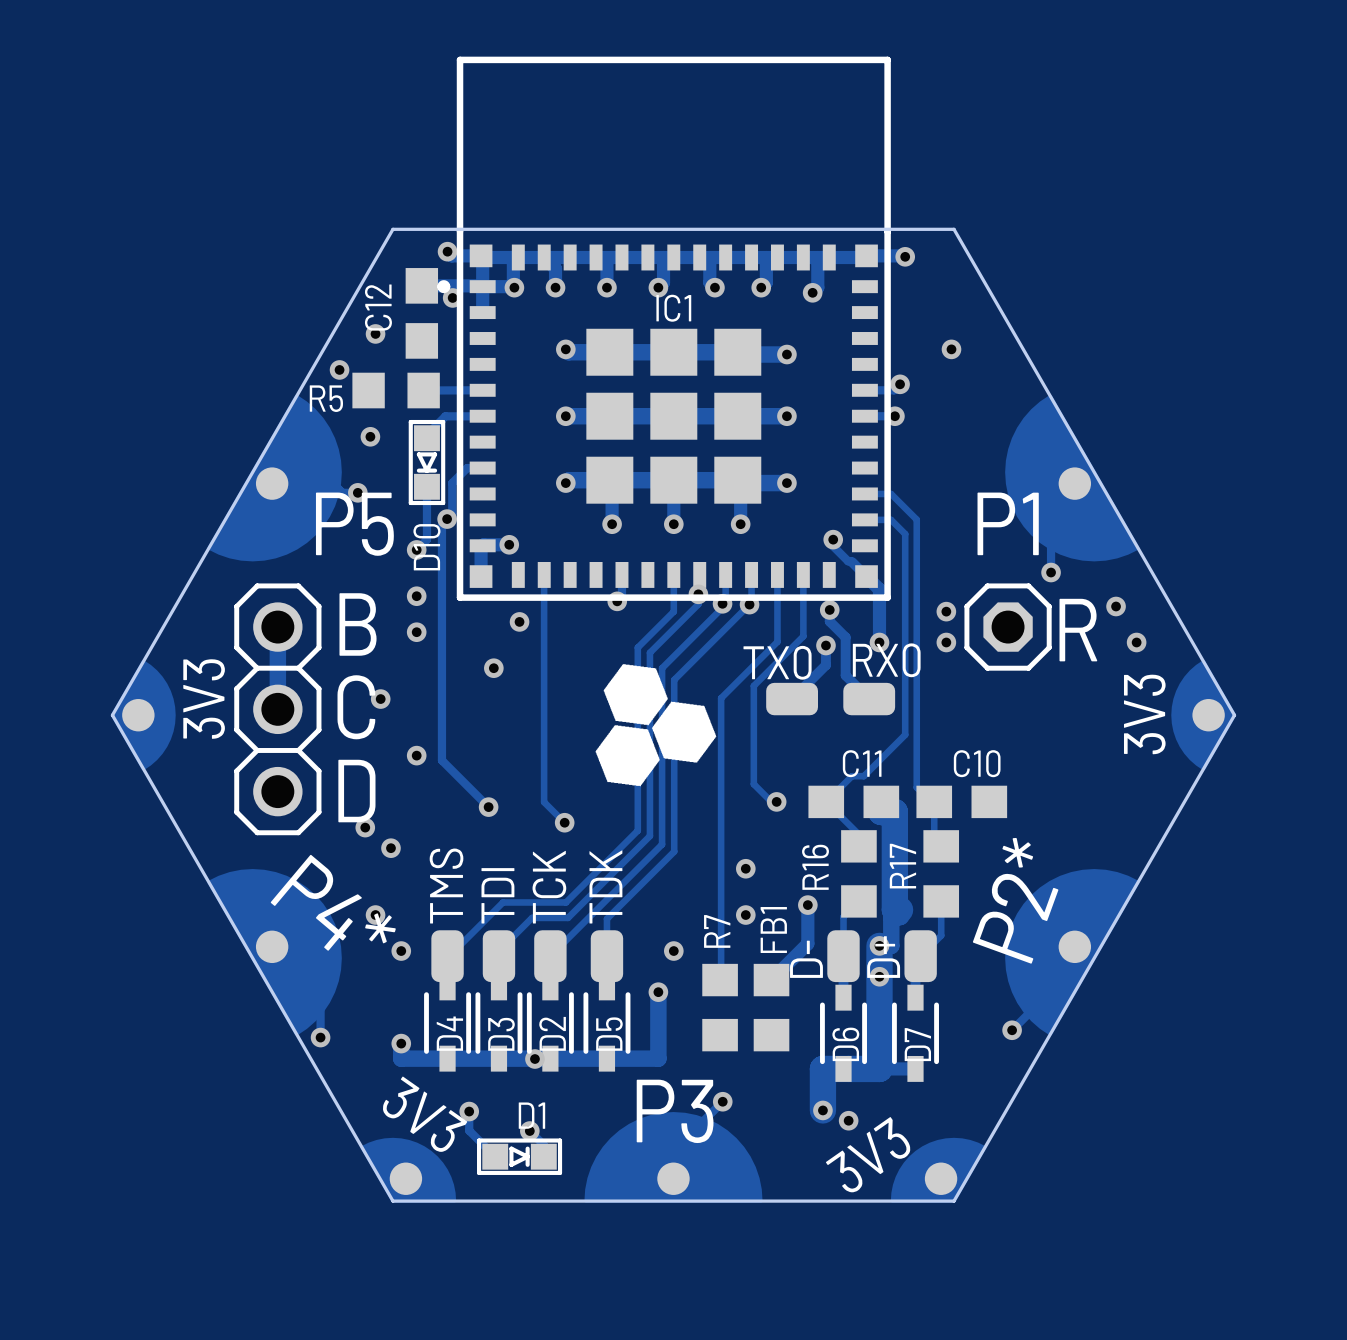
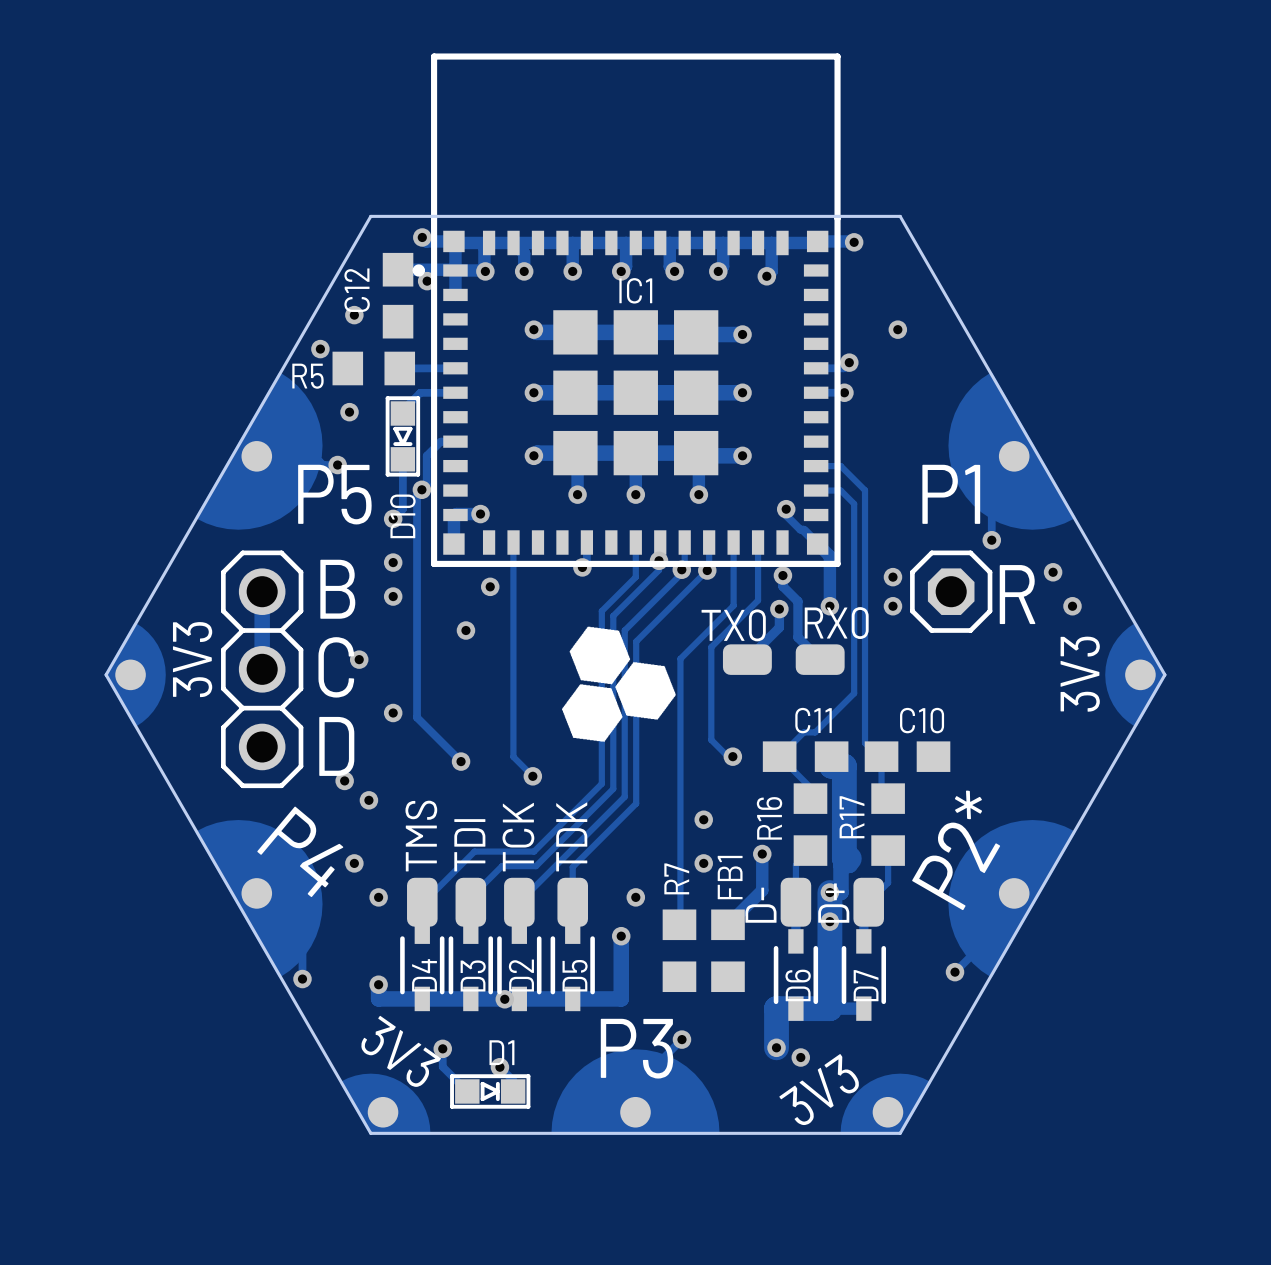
text rotation: 0° (1015, 900) -> 10° clockwise (956, 850)
text: P4* (333, 902) -> P4 (300, 851)

